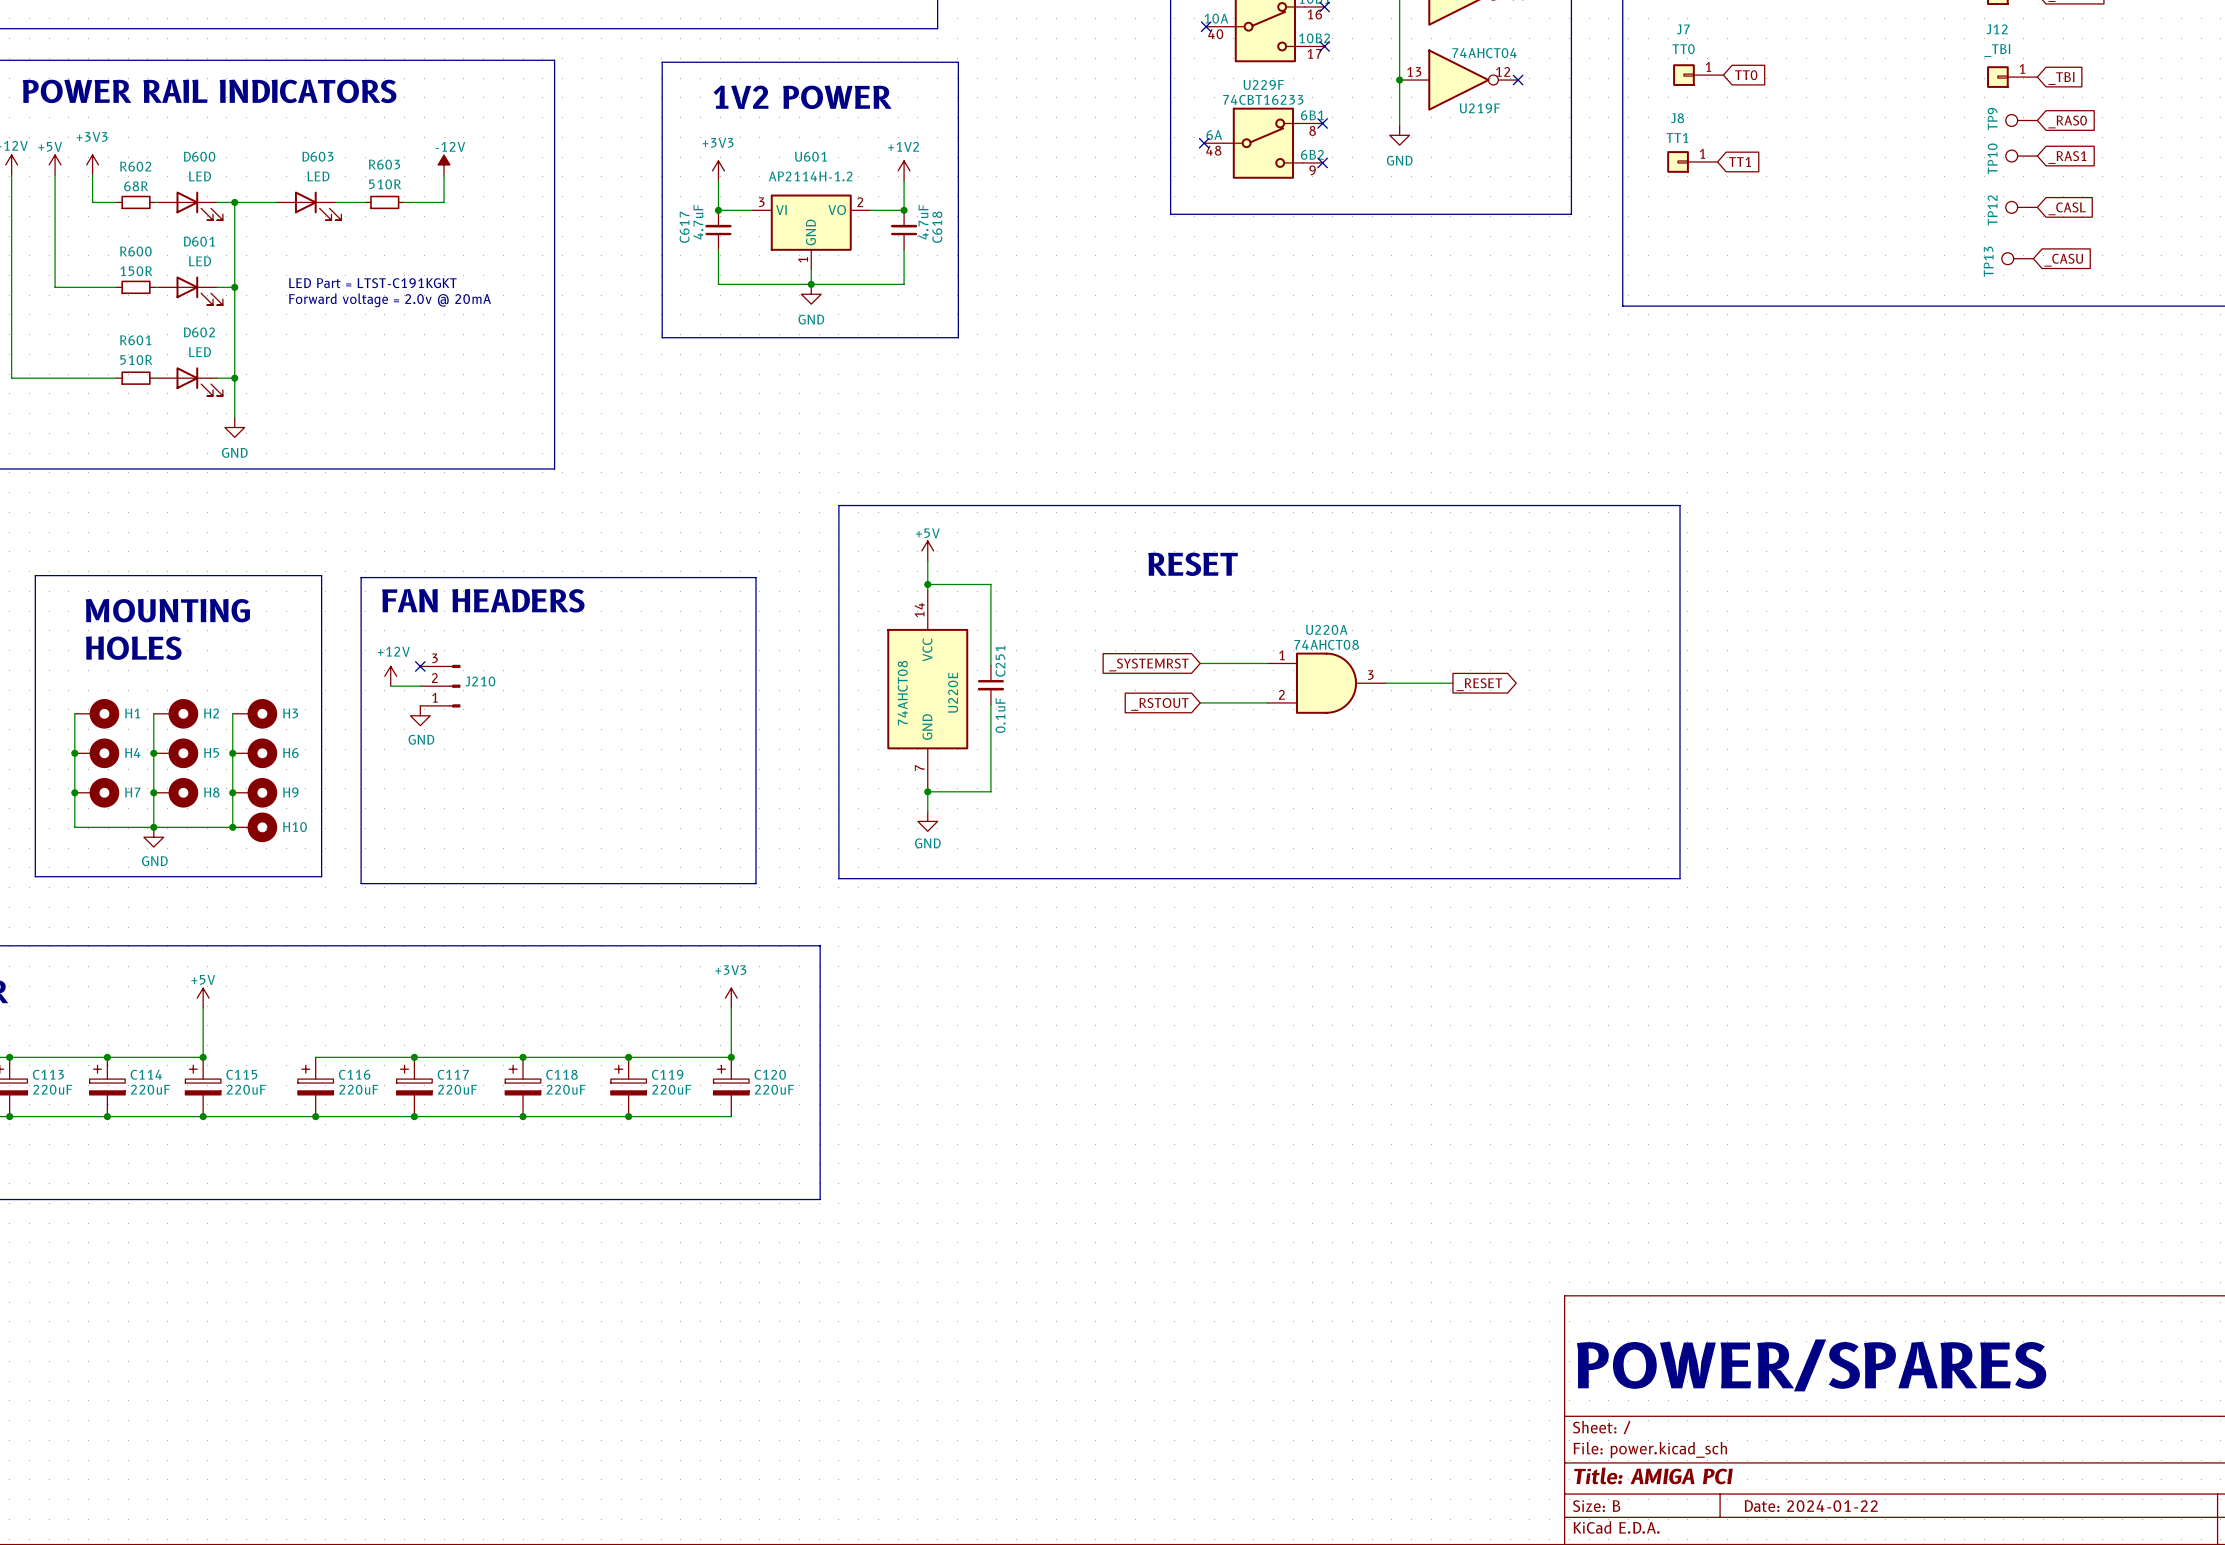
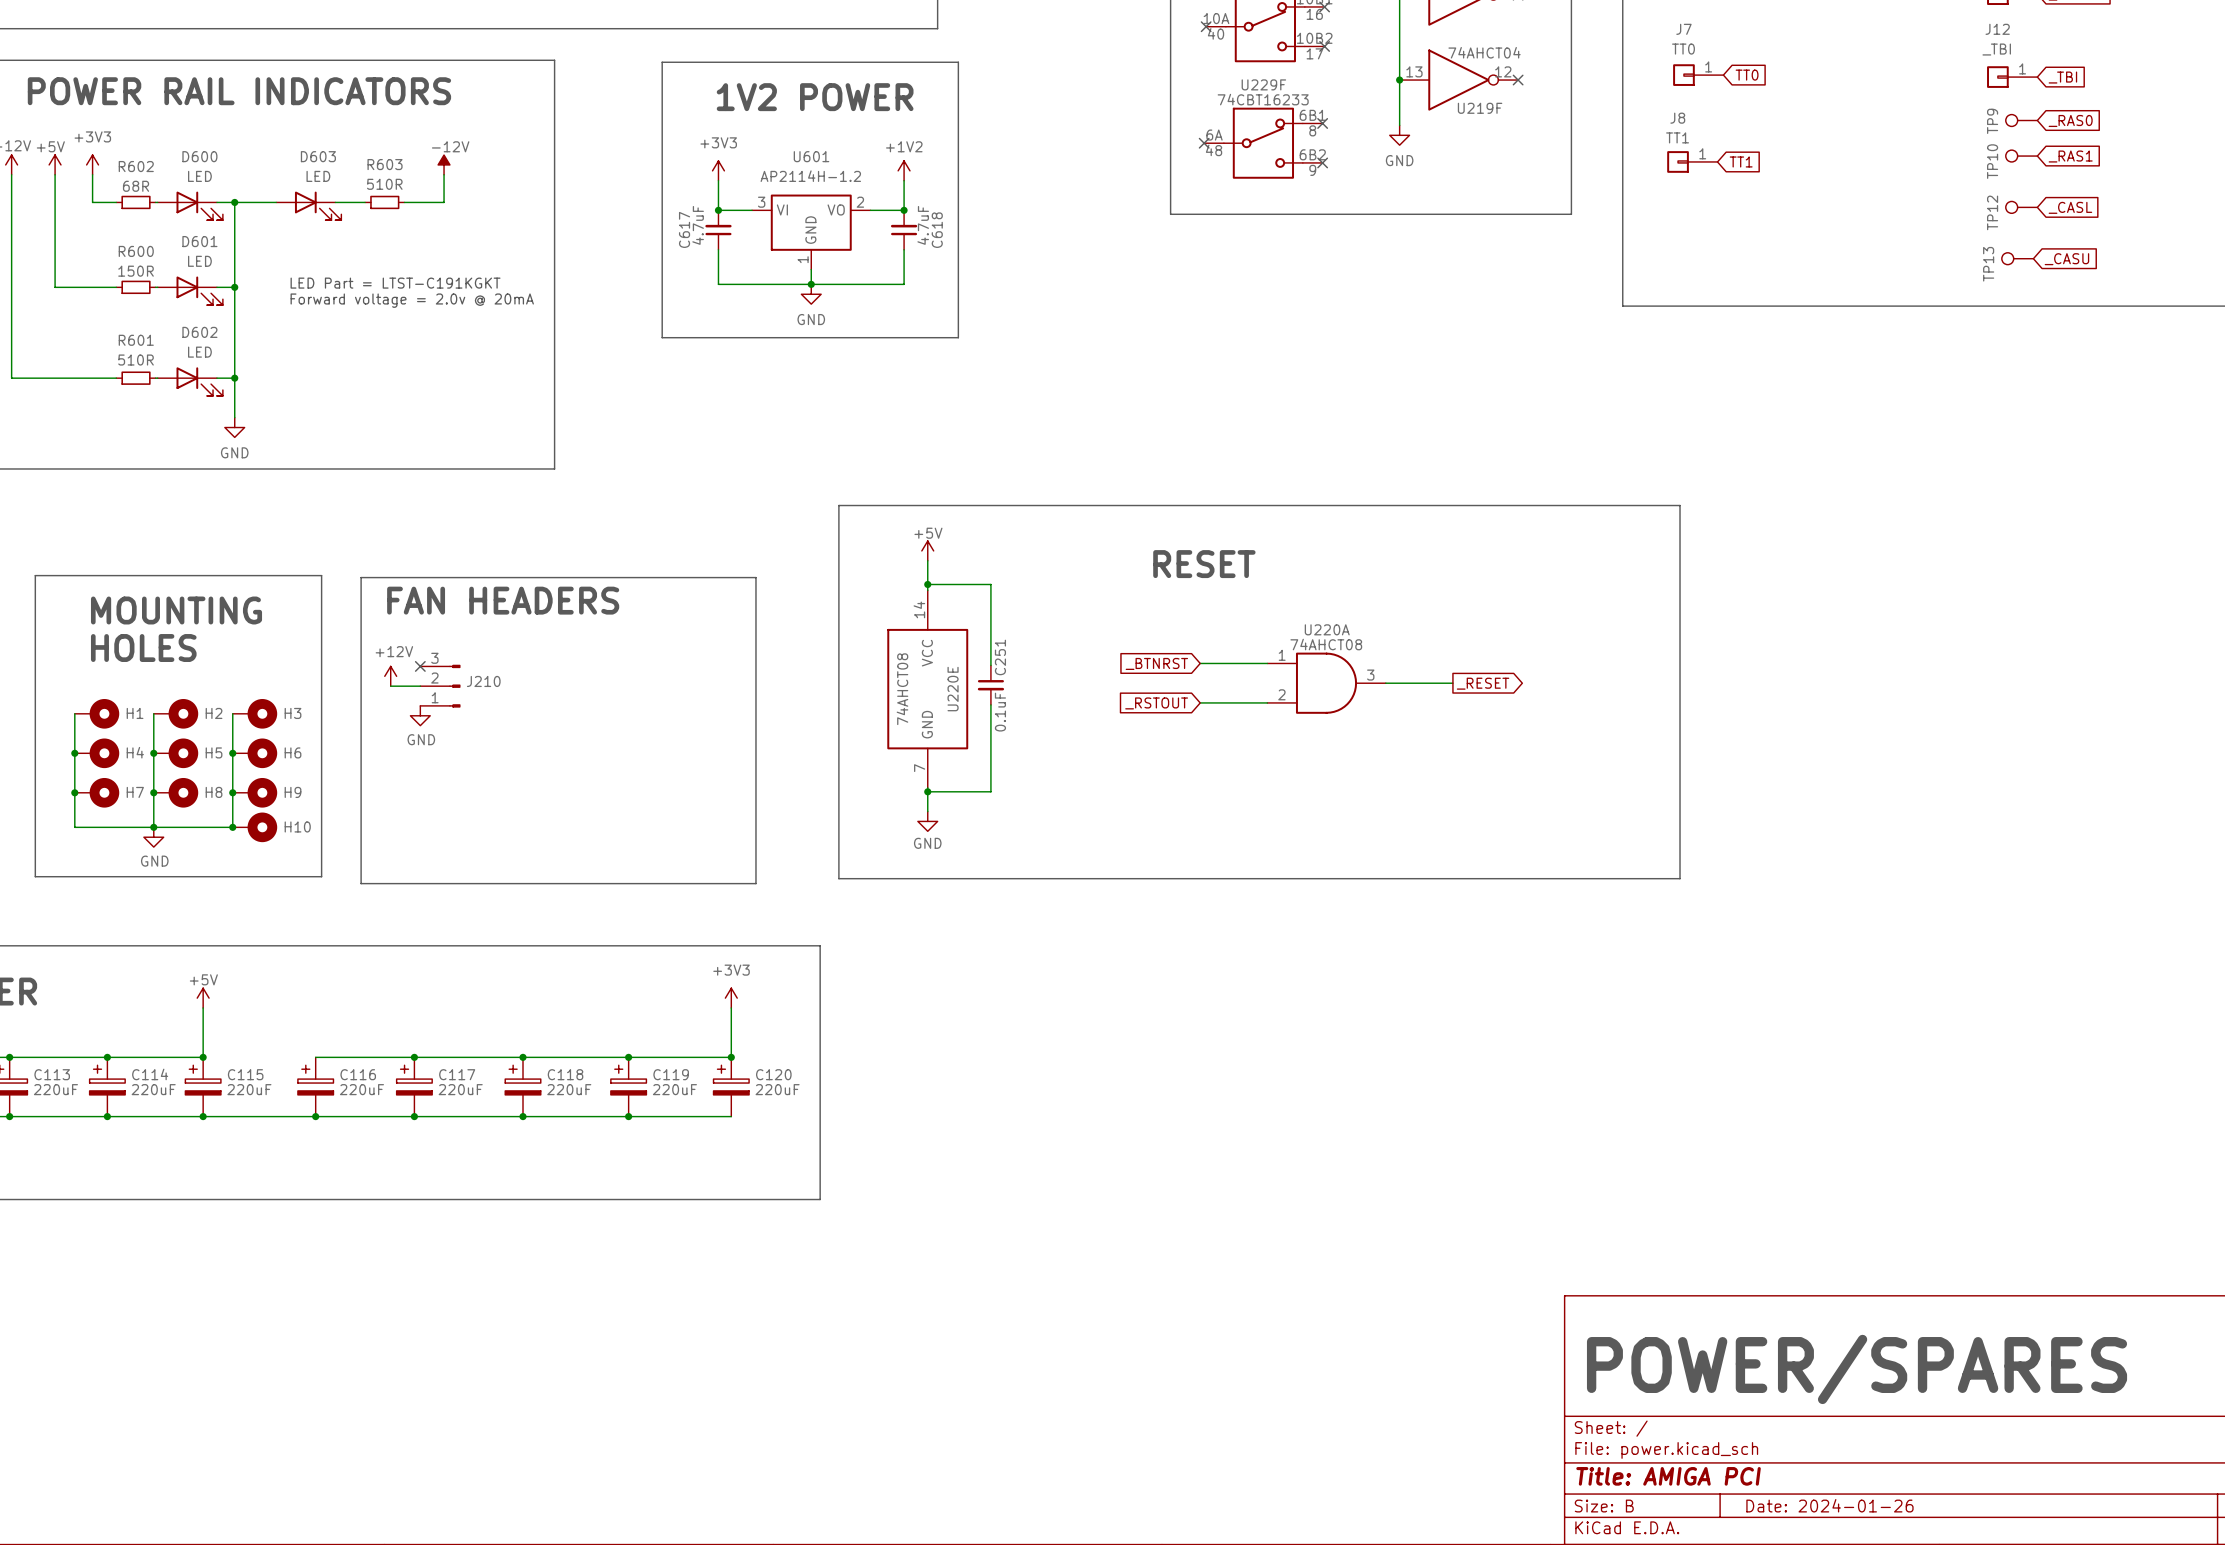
global label: _SYSTEMRST (1148, 664) -> _BTNRST (1156, 663)
title block: Date: 2024-01-22 (1811, 1506) -> Date: 2024-01-26 (1829, 1505)

